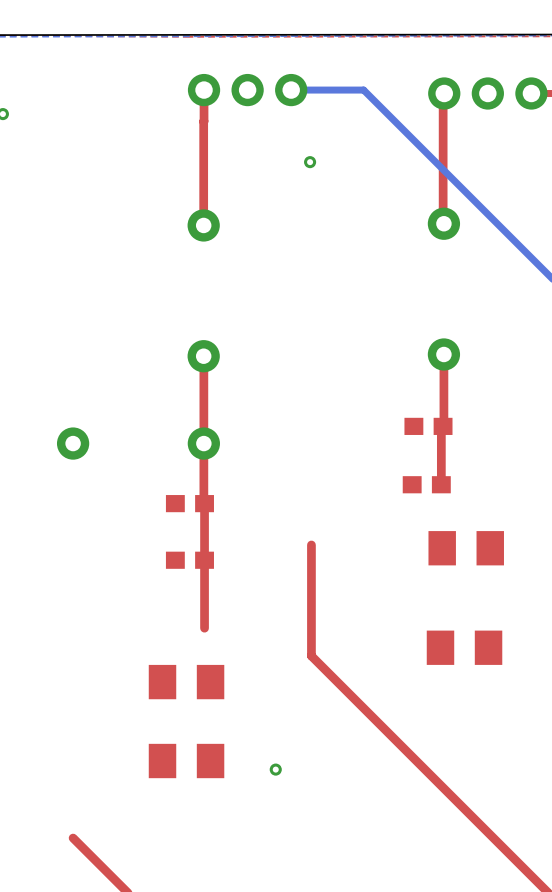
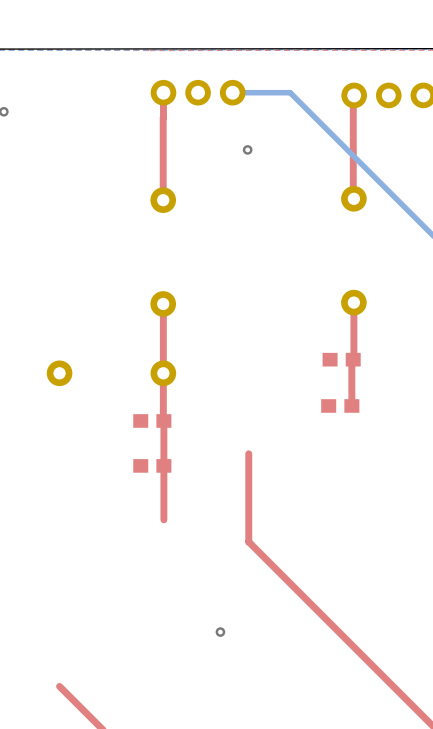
part: (466, 548) -> none
part: (464, 647) -> none
part: (186, 682) -> none
part: (186, 761) -> none

